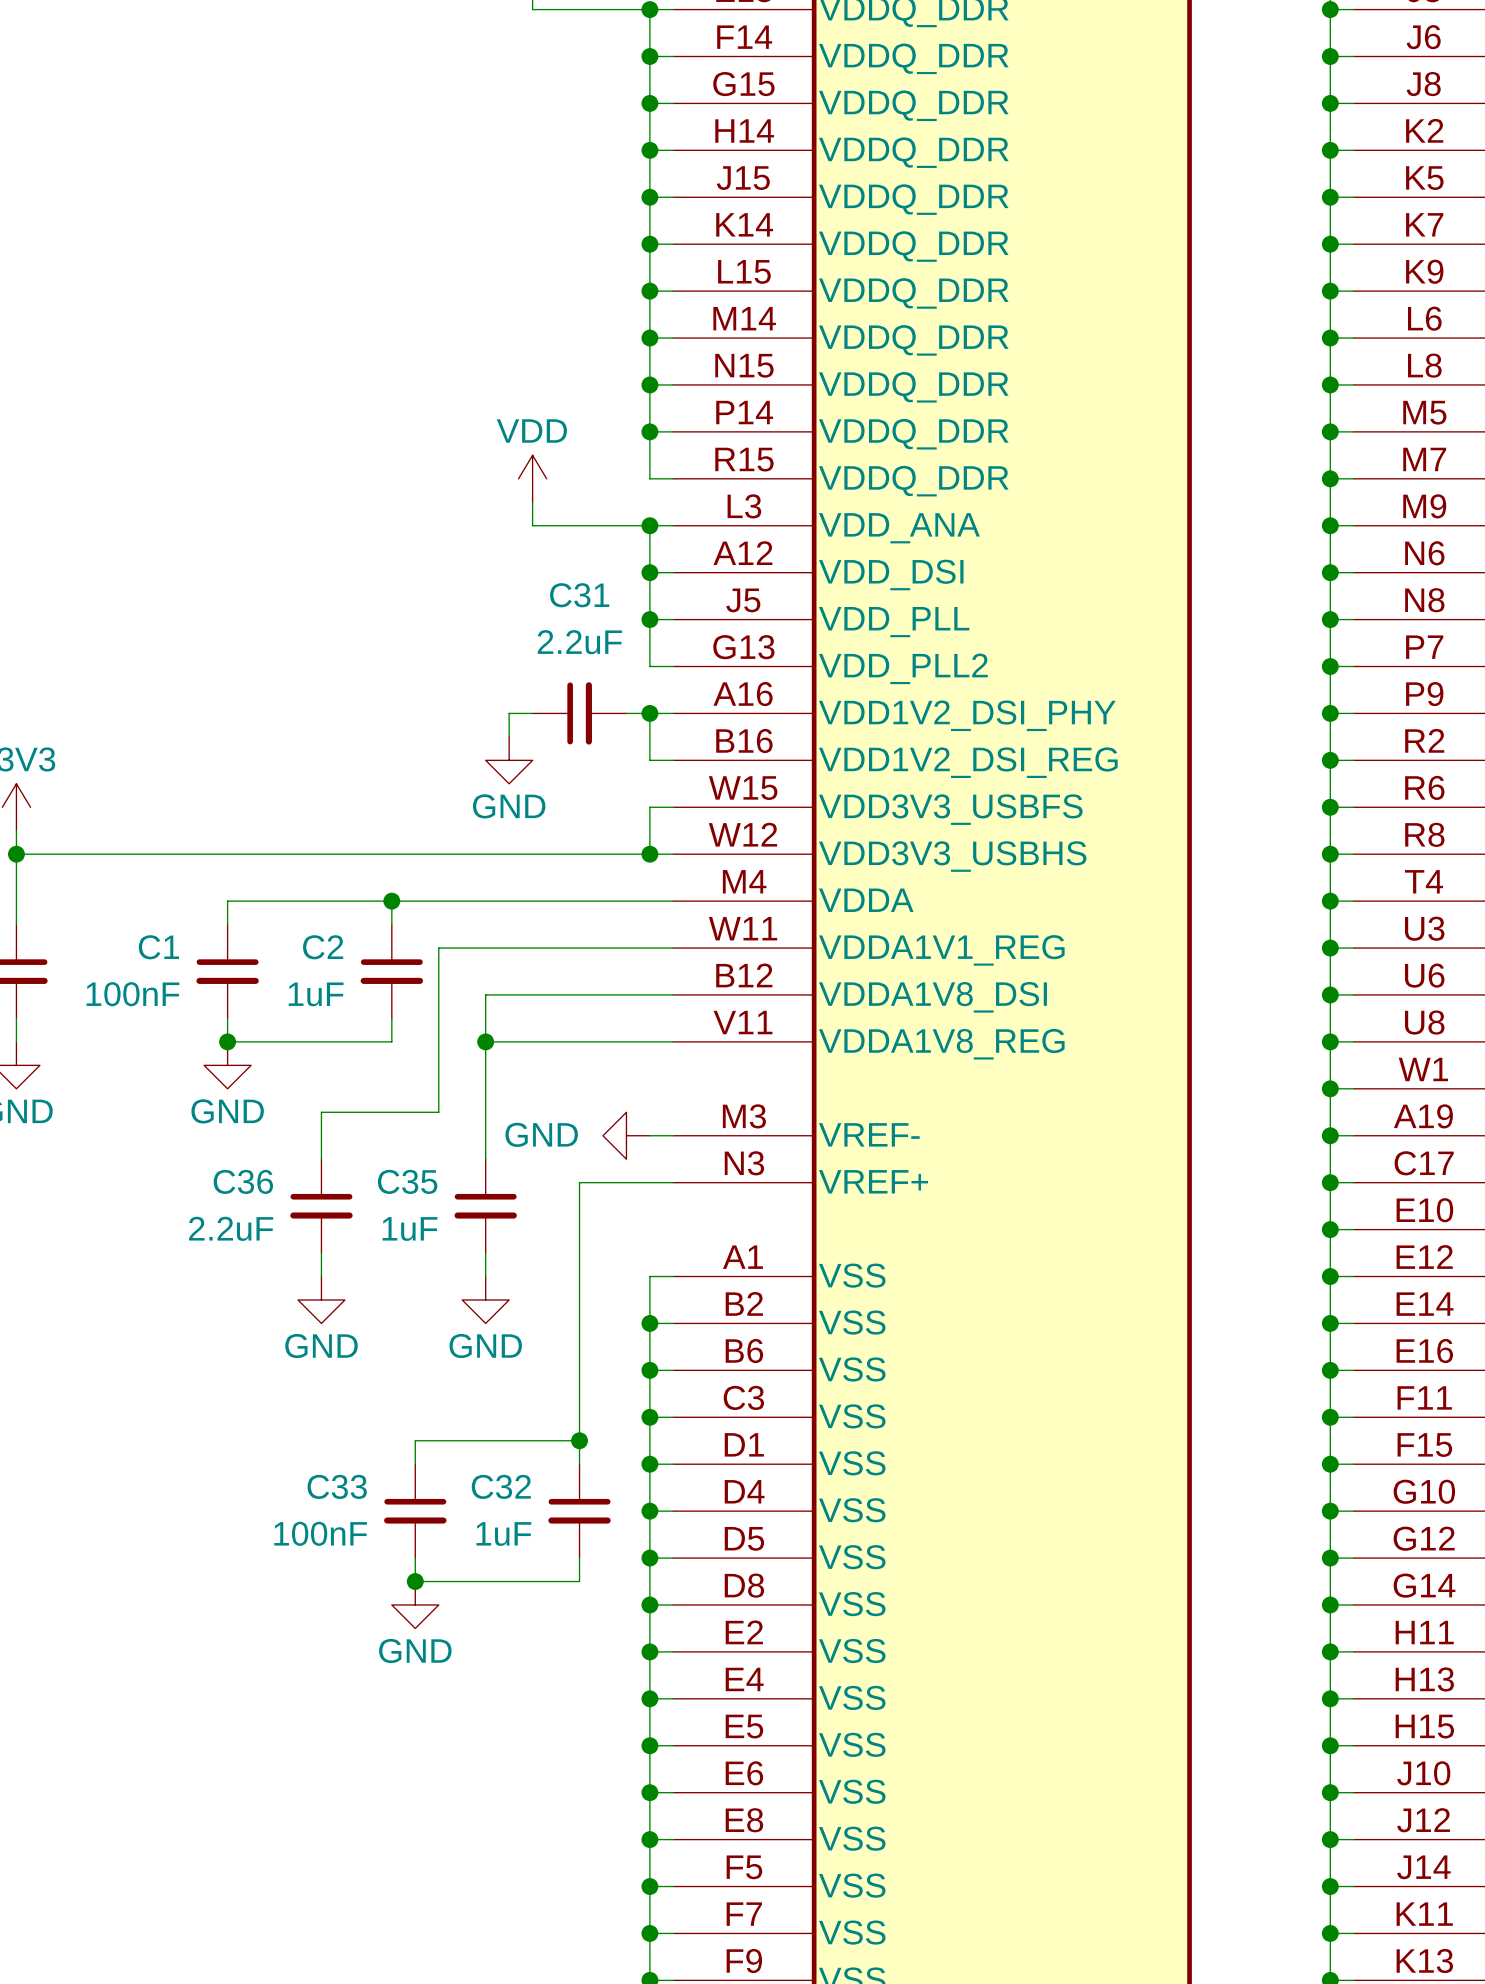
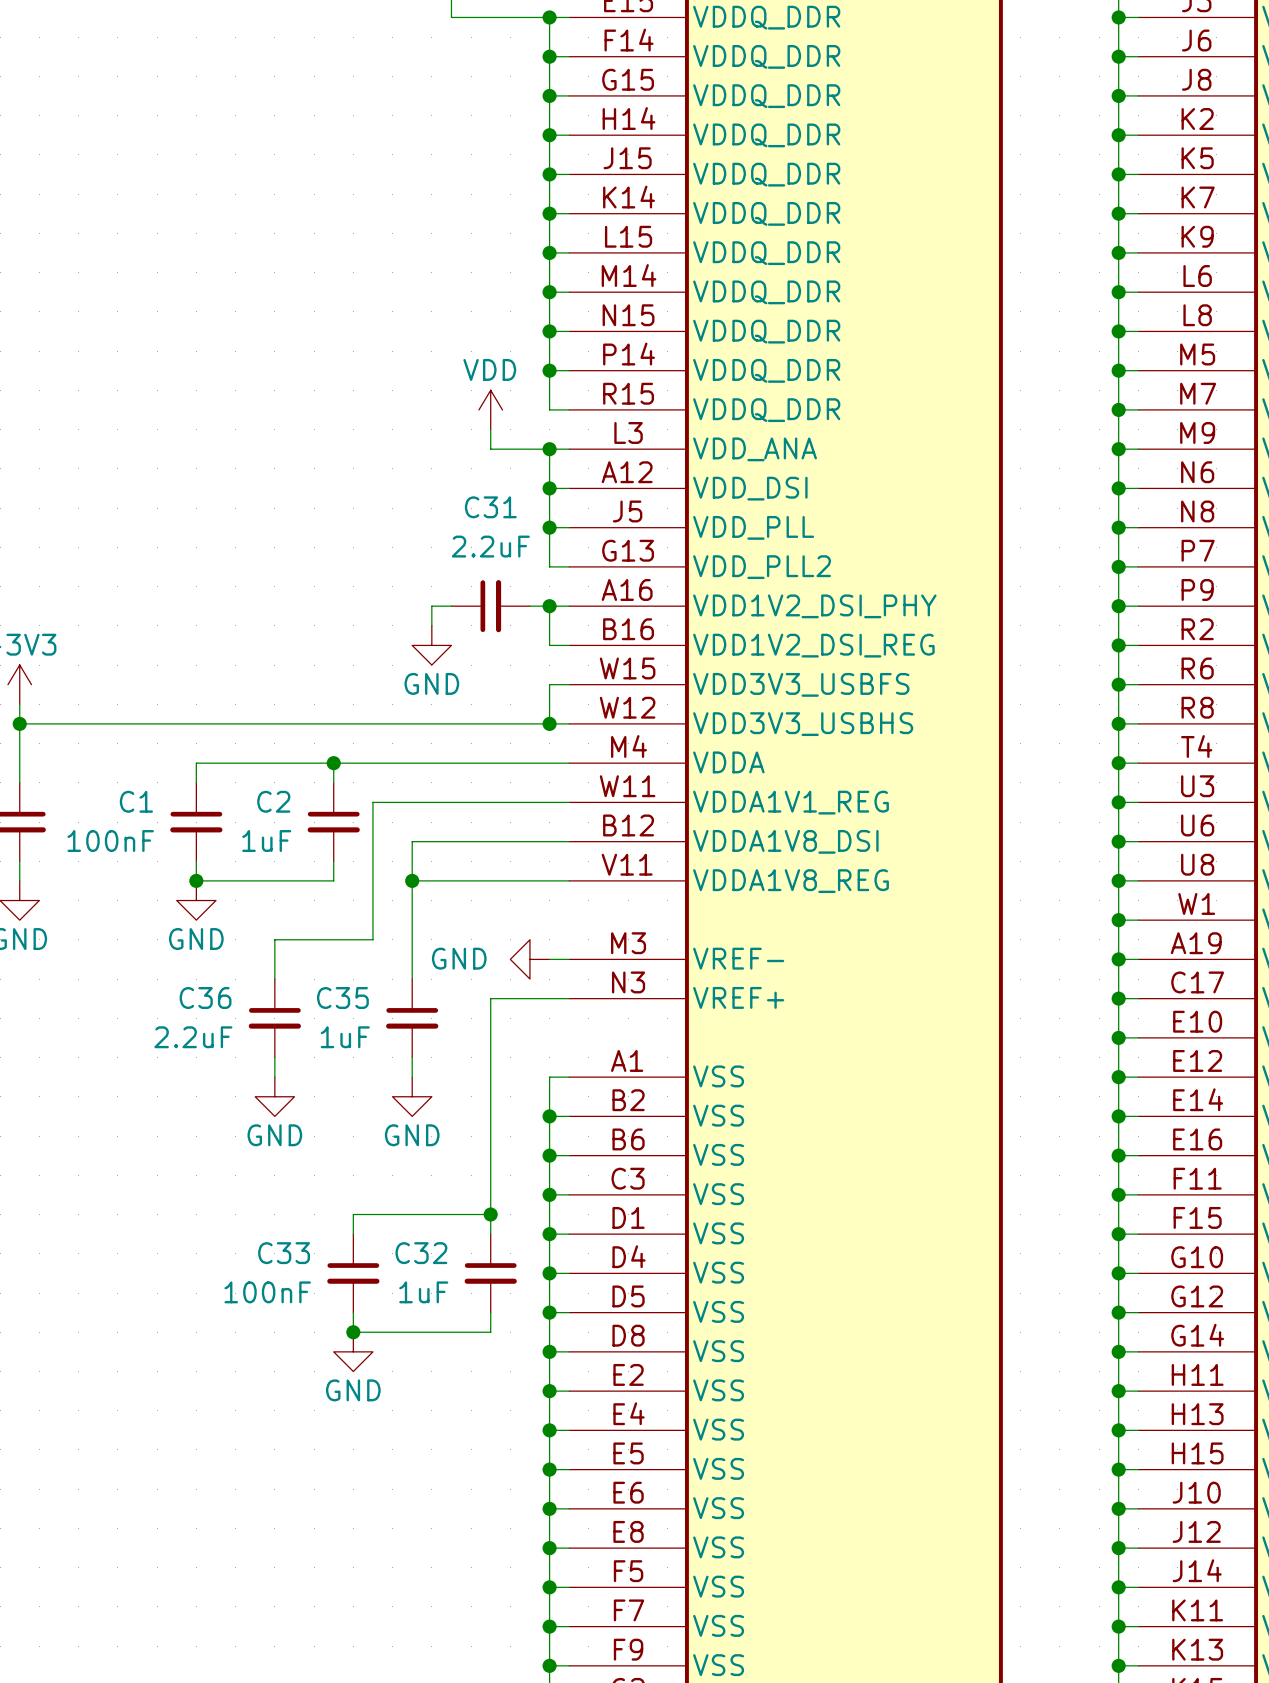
power symbol position: VDD (532, 478) -> VDD (490, 409)
wire: (532, 502) (532, 525) (579, 525) -> (490, 429) (490, 449)

